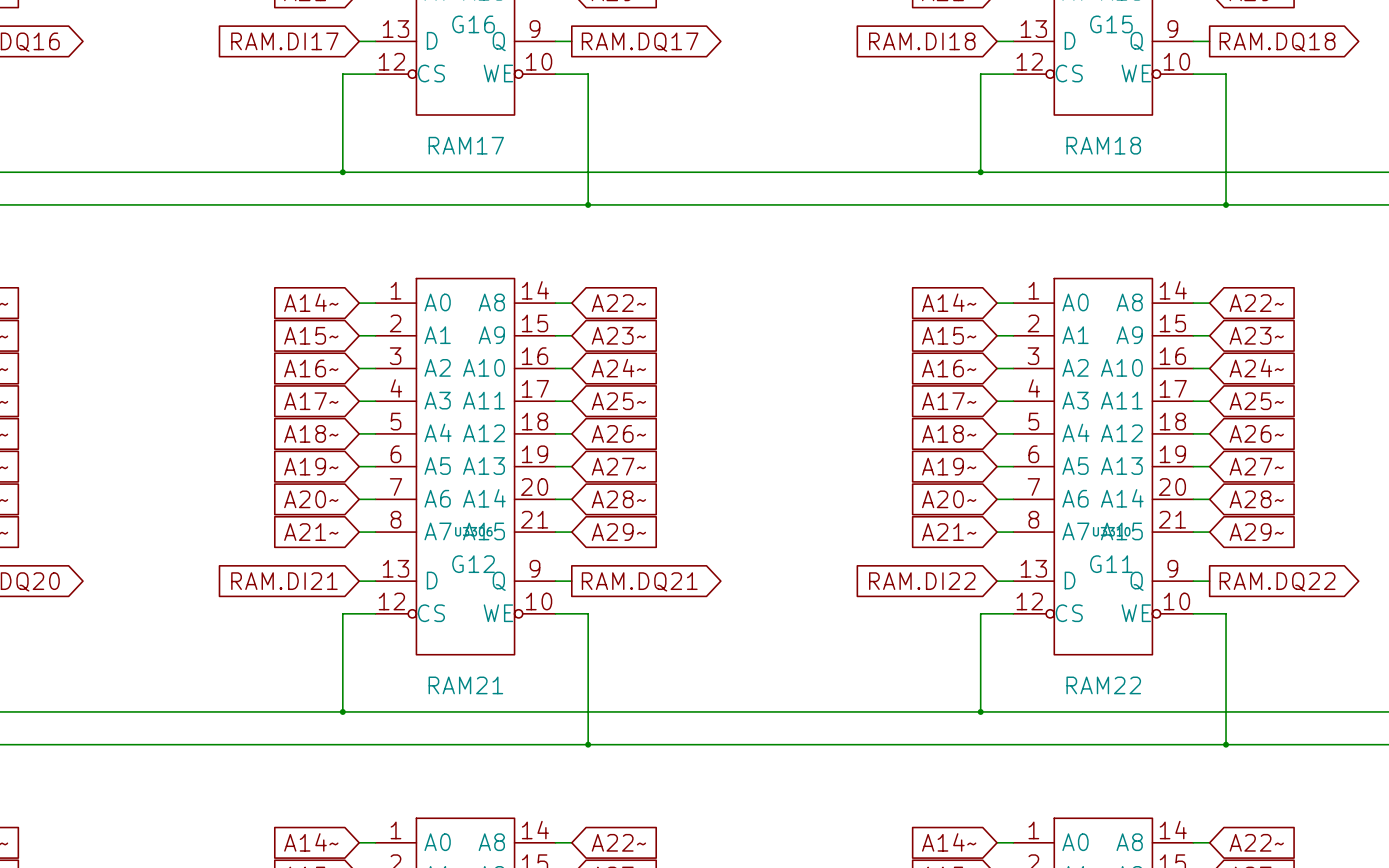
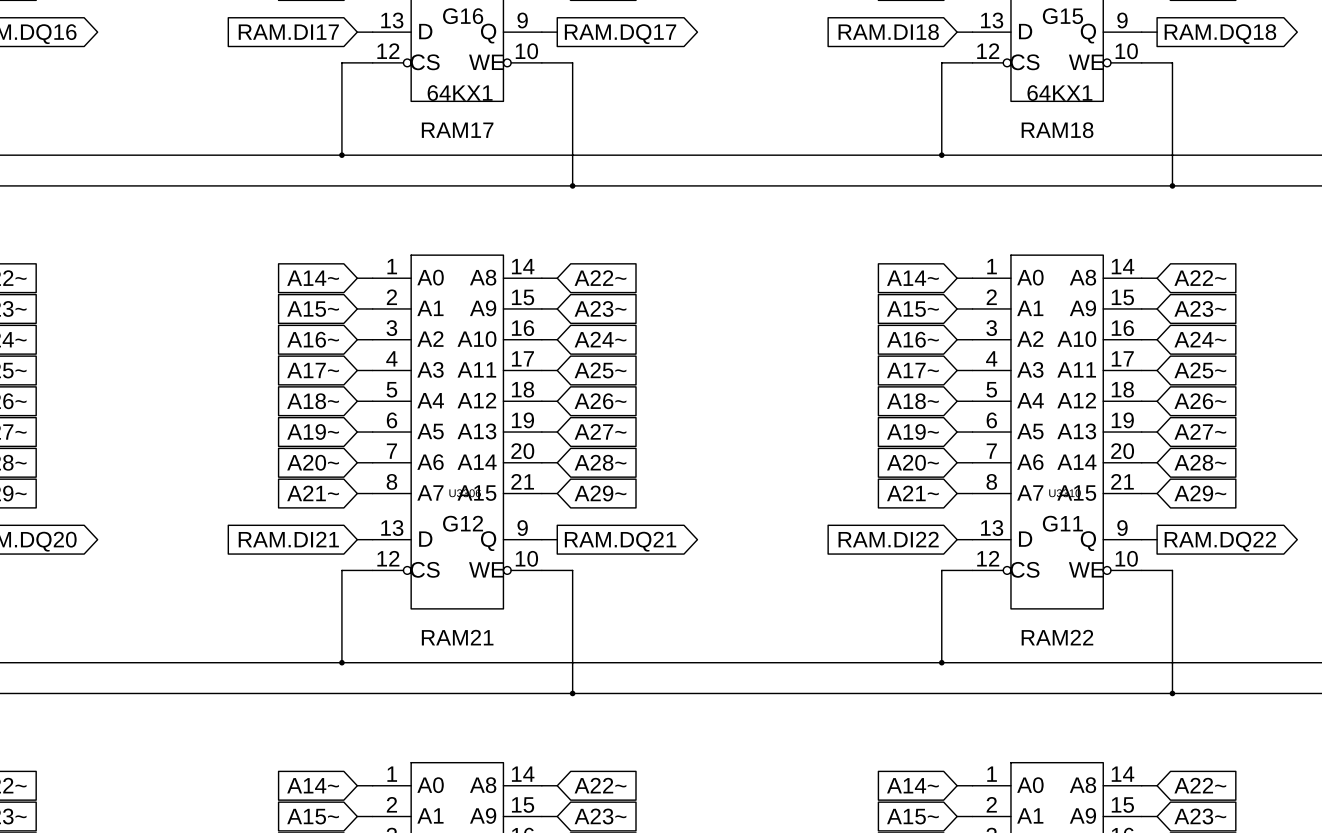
part value: none -> 64KX1 (460, 93)
part value: none -> 64KX1 (1059, 93)

